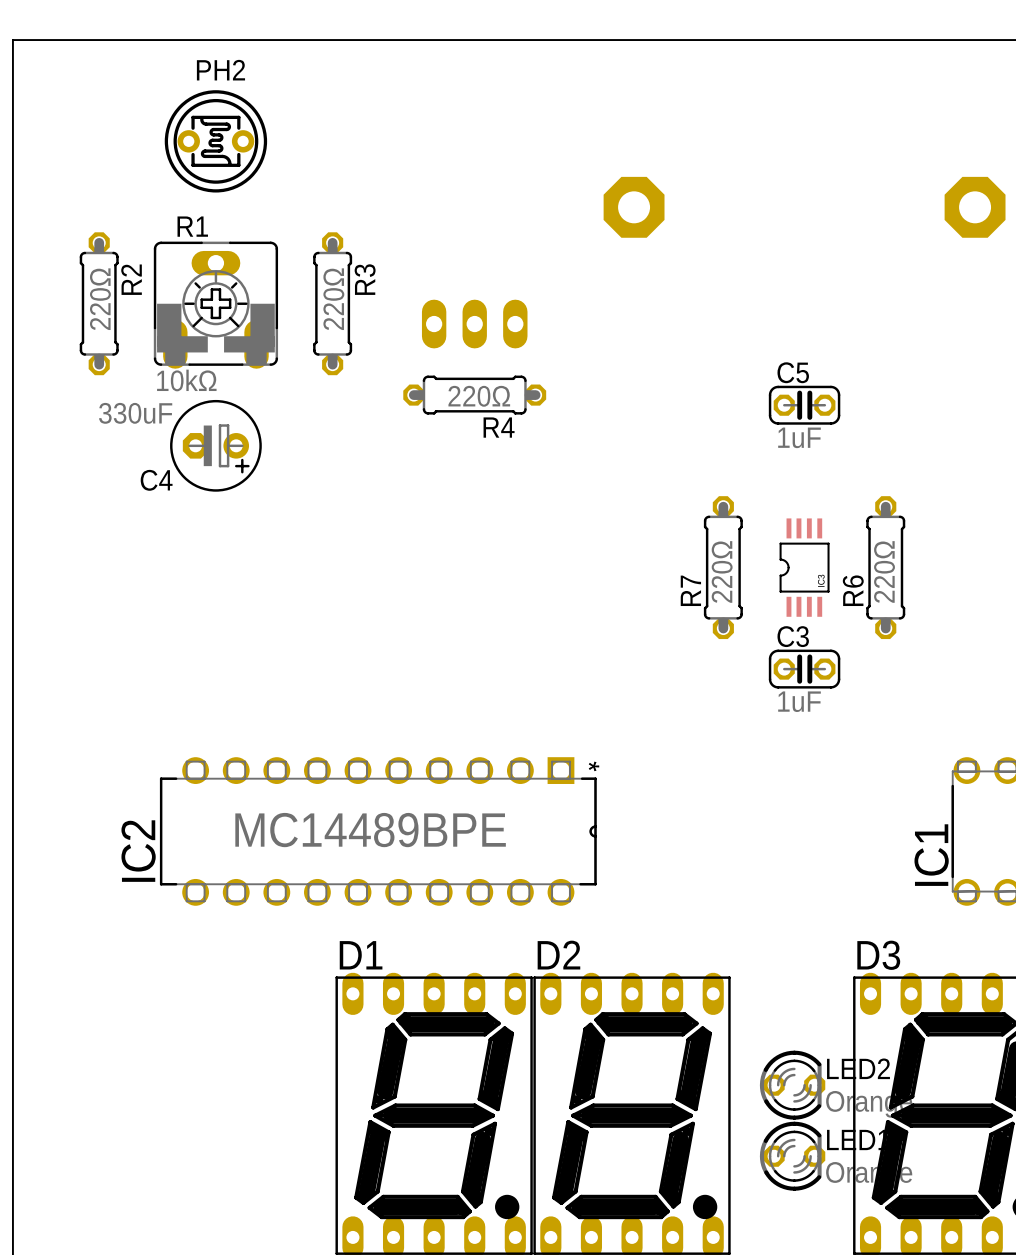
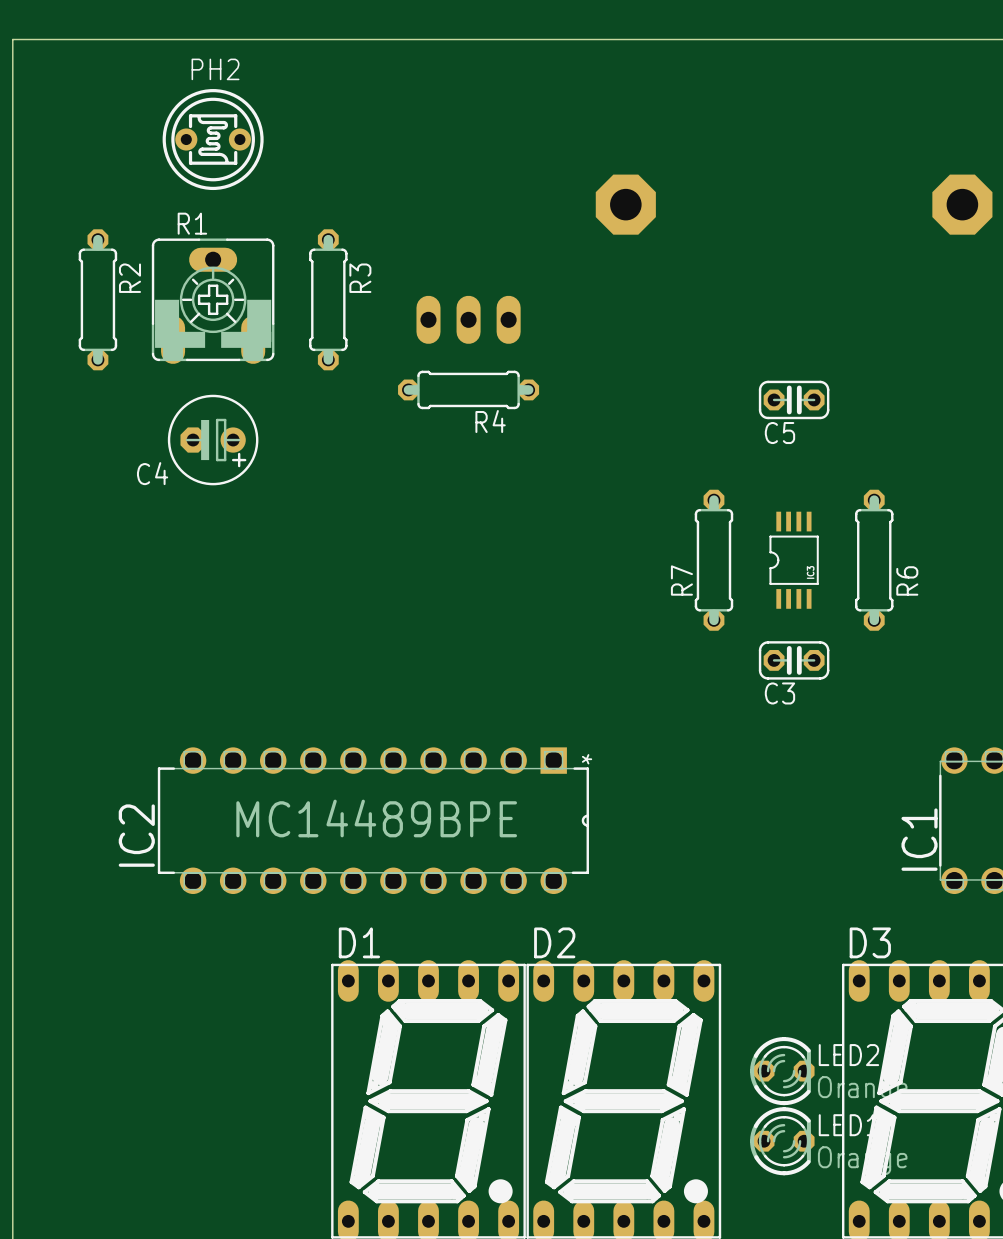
R2 value: 220Ω (100, 299) -> none
R3 value: 220Ω (333, 299) -> none
C5 name position: C5 (793, 372) -> C5 (779, 433)
R1 value: 10kΩ (186, 380) -> none
R4 value: 220Ω (479, 396) -> none
C4 value: 330uF (135, 413) -> none
C5 value: 1uF (799, 437) -> none
R7 value: 220Ω (722, 571) -> none
R6 value: 220Ω (884, 571) -> none
R6 name position: R6 (853, 590) -> R6 (907, 580)
C3 name position: C3 (793, 636) -> C3 (779, 693)
C3 value: 1uF (799, 701) -> none

